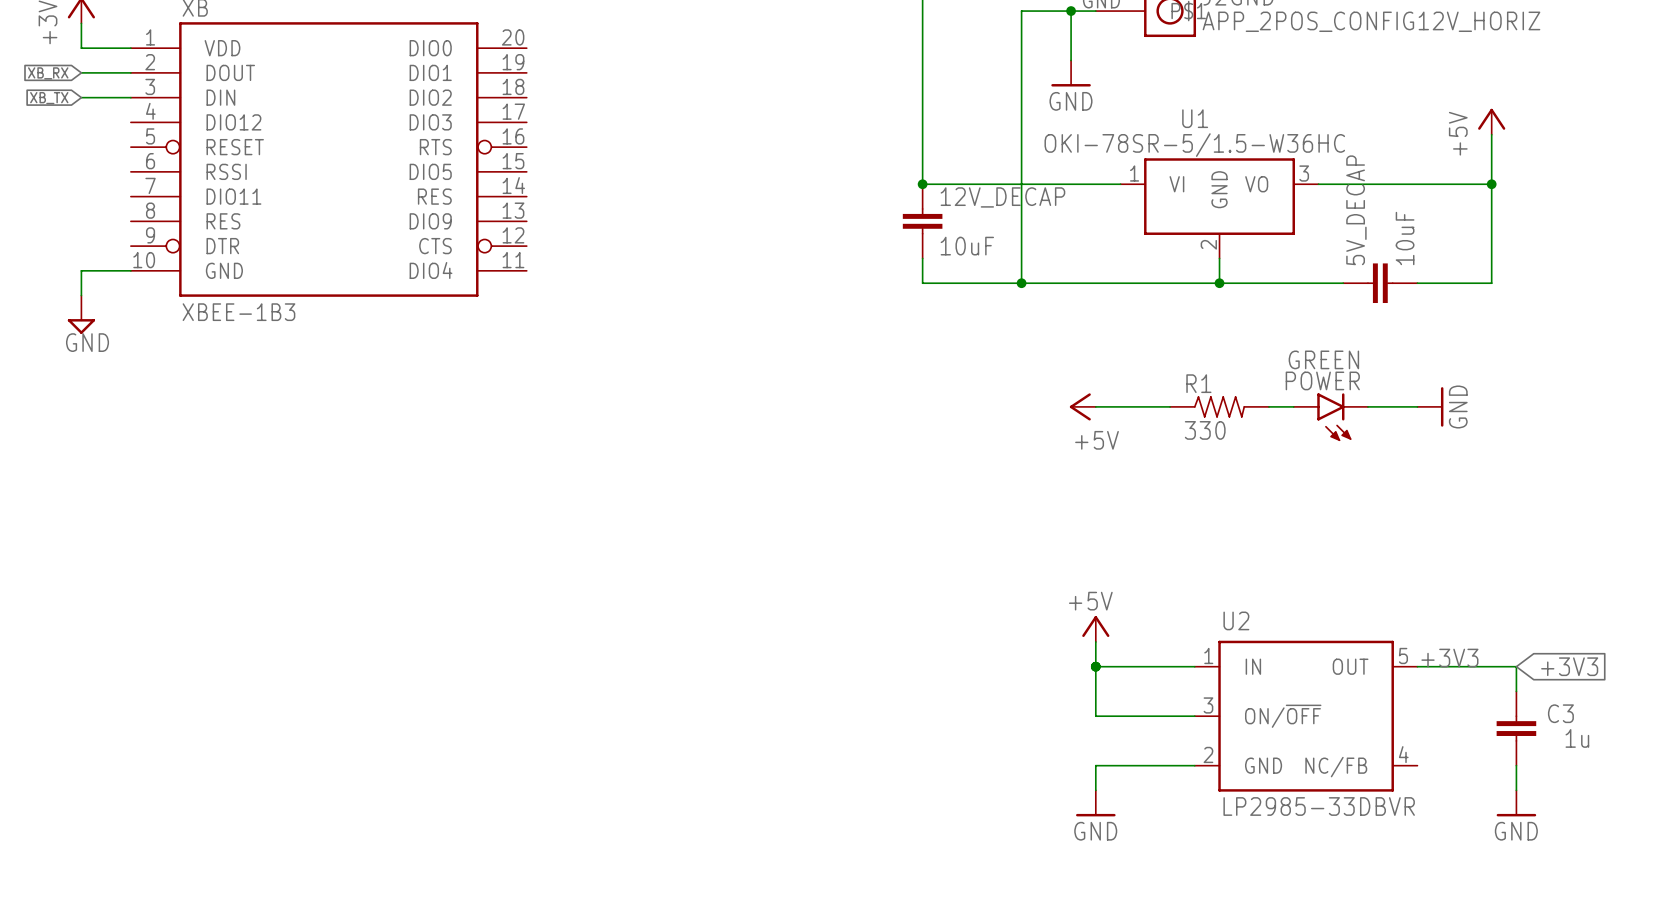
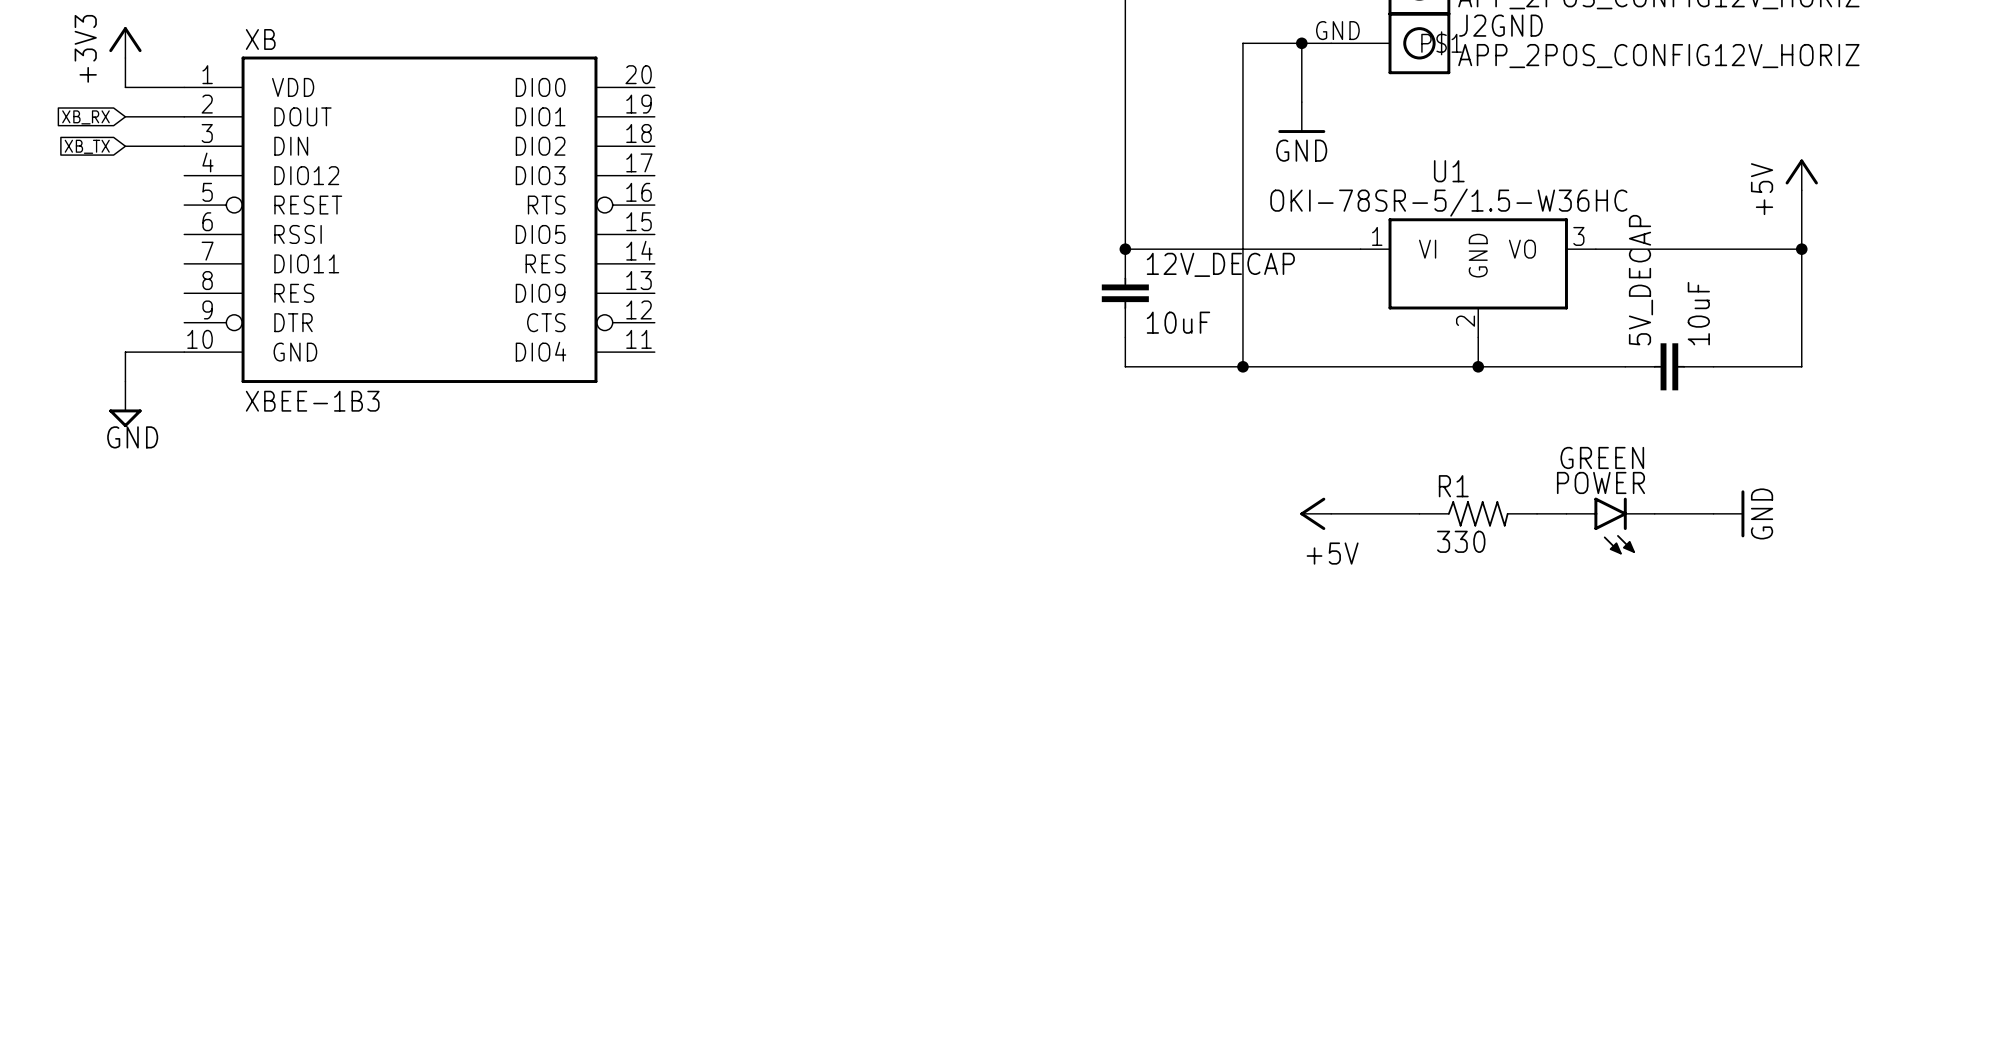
power symbol: +5V (1095, 628) -> none
wire: (1095, 641) (1095, 716) (1194, 716) -> none
label: +3V3 (1449, 658) -> none
wire: (1095, 666) (1194, 666) -> none
junction: (1095, 666) -> none
wire: (1417, 666) (1516, 666) (1516, 691) -> none
global label: +3V3 (1569, 666) -> none
U2: LP2985-33DBVR (1306, 716) -> none
C3: 1u (1516, 728) -> none
wire: (1194, 765) (1095, 765) (1095, 790) -> none
wire: (1516, 765) (1516, 790) -> none
power symbol: GND (1095, 803) -> none
power symbol: GND (1516, 803) -> none

